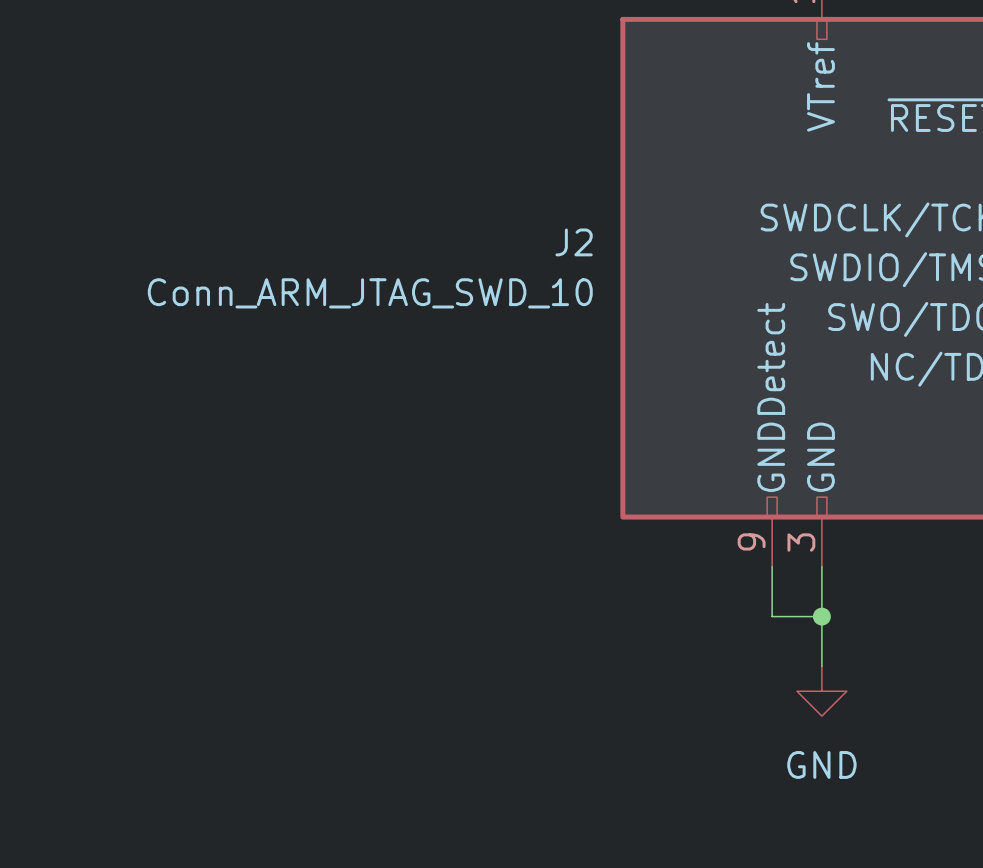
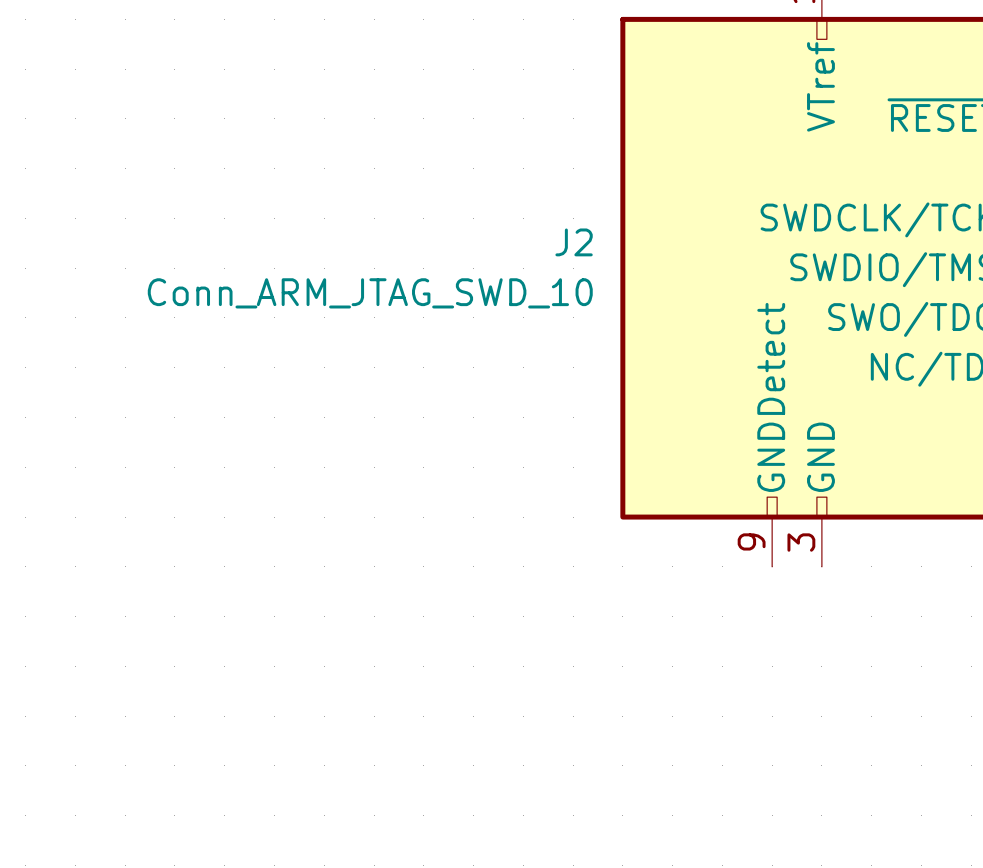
wire: (772, 566) (772, 616) (821, 616) -> none
wire: (821, 566) (821, 666) -> none
junction: (821, 616) -> none
power symbol: GND (821, 691) -> none

